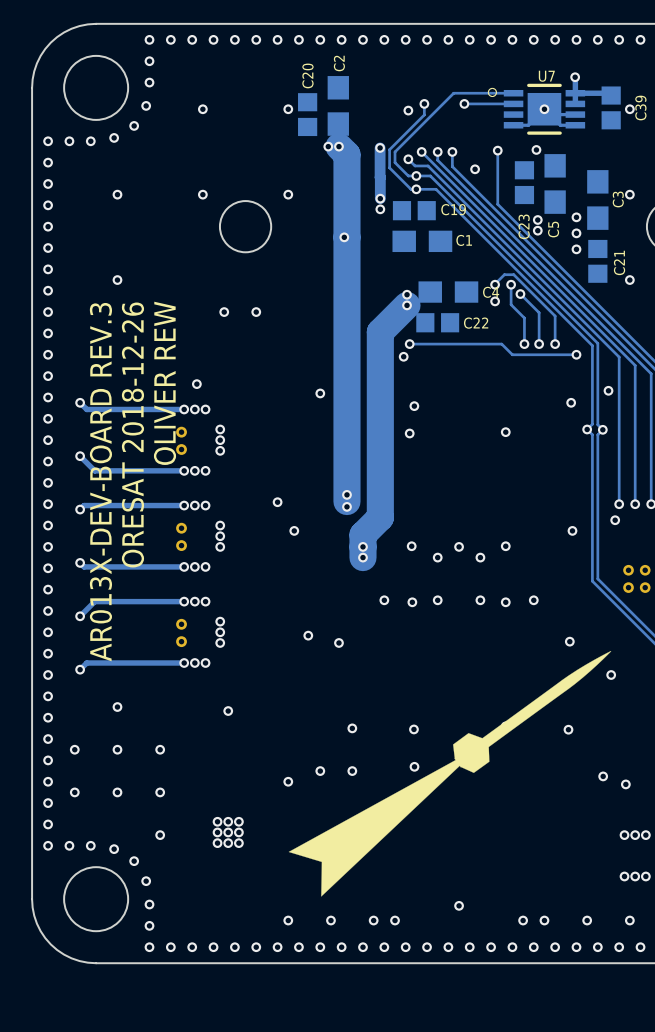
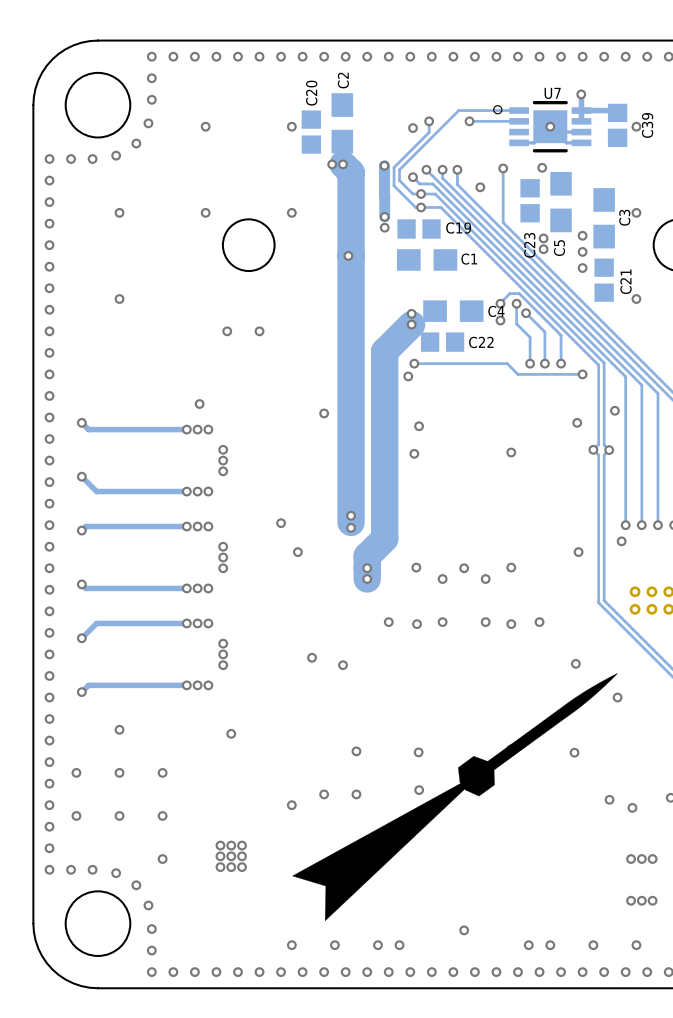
text: OLIVER REW (164, 383) -> none
text: ORESAT 2018-12-26 (132, 435) -> none
part: (181, 440) -> none
text: AR013X-DEV-BOARD REV.3 (100, 482) -> none
part: (181, 536) -> none
part: (181, 632) -> none

